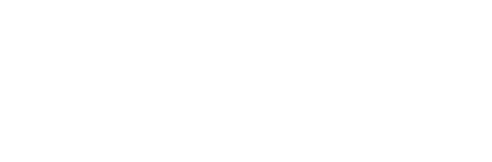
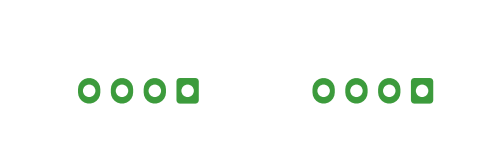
part: none -> (138, 90)
part: none -> (372, 90)

